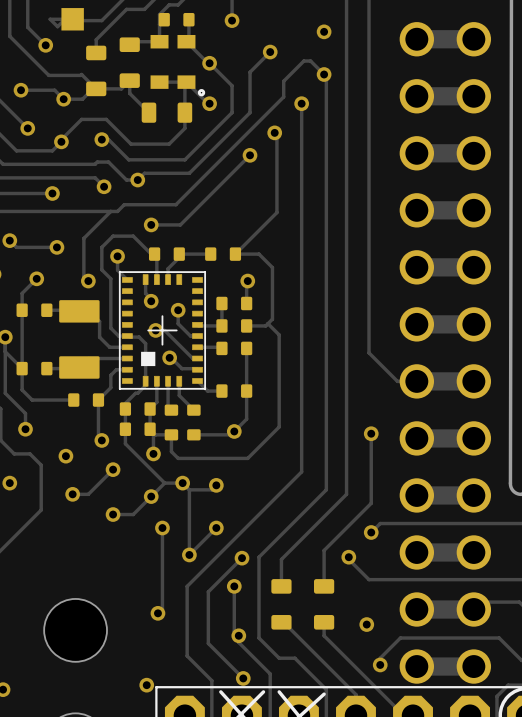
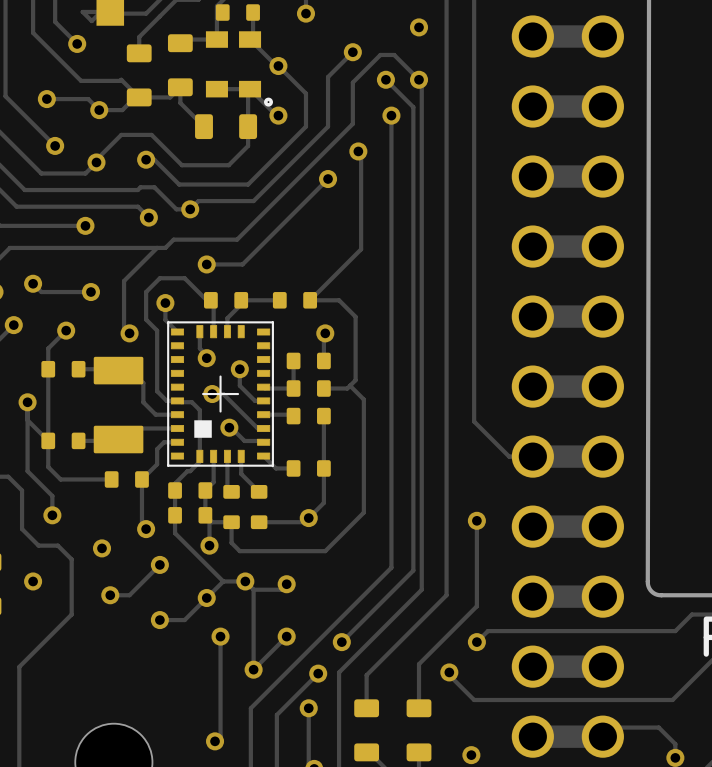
track: (310, 61) (303, 61) (283, 81) (283, 96) (270, 110) -> (402, 63) (394, 54) (380, 54) (352, 82) (352, 123)
track: none -> (385, 79) (413, 107) (413, 570) (341, 642)
via: none -> (385, 79)
via: none -> (341, 642)

